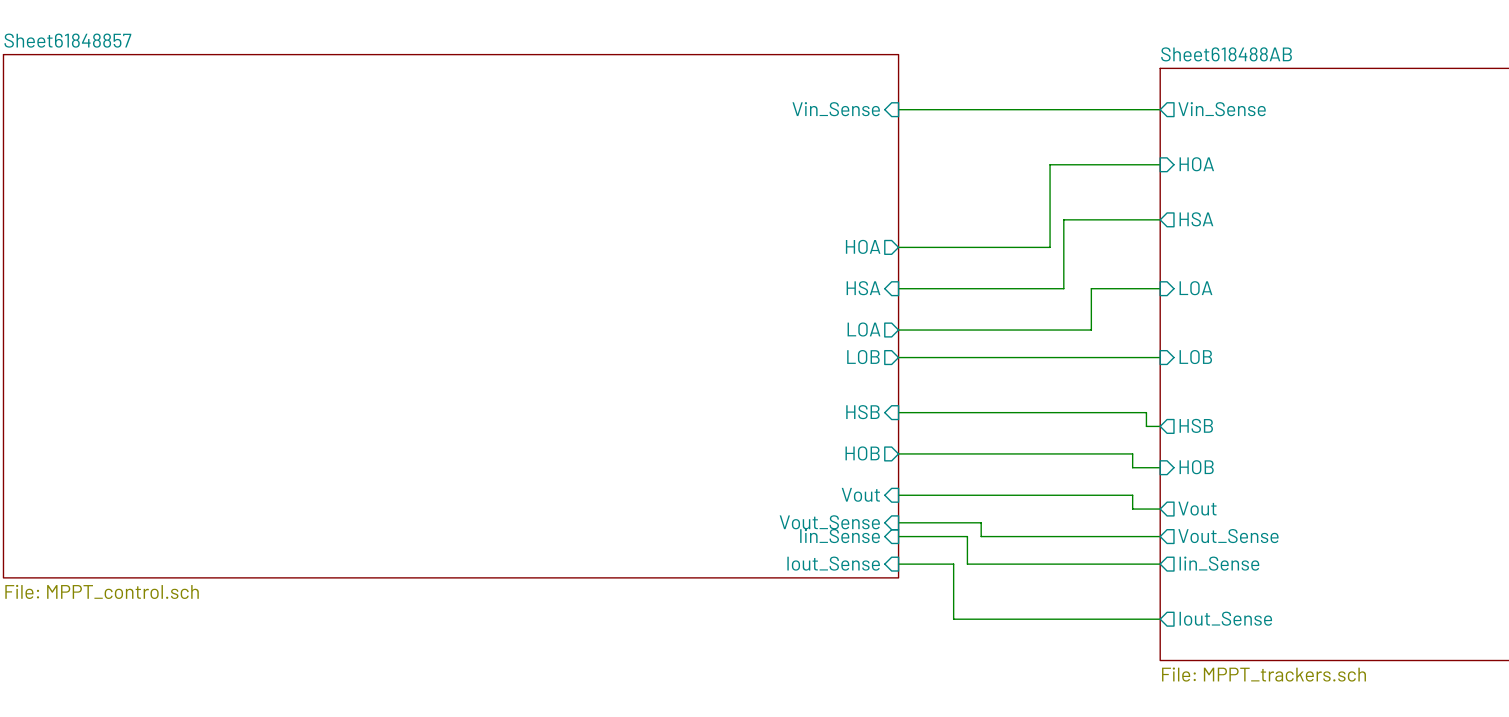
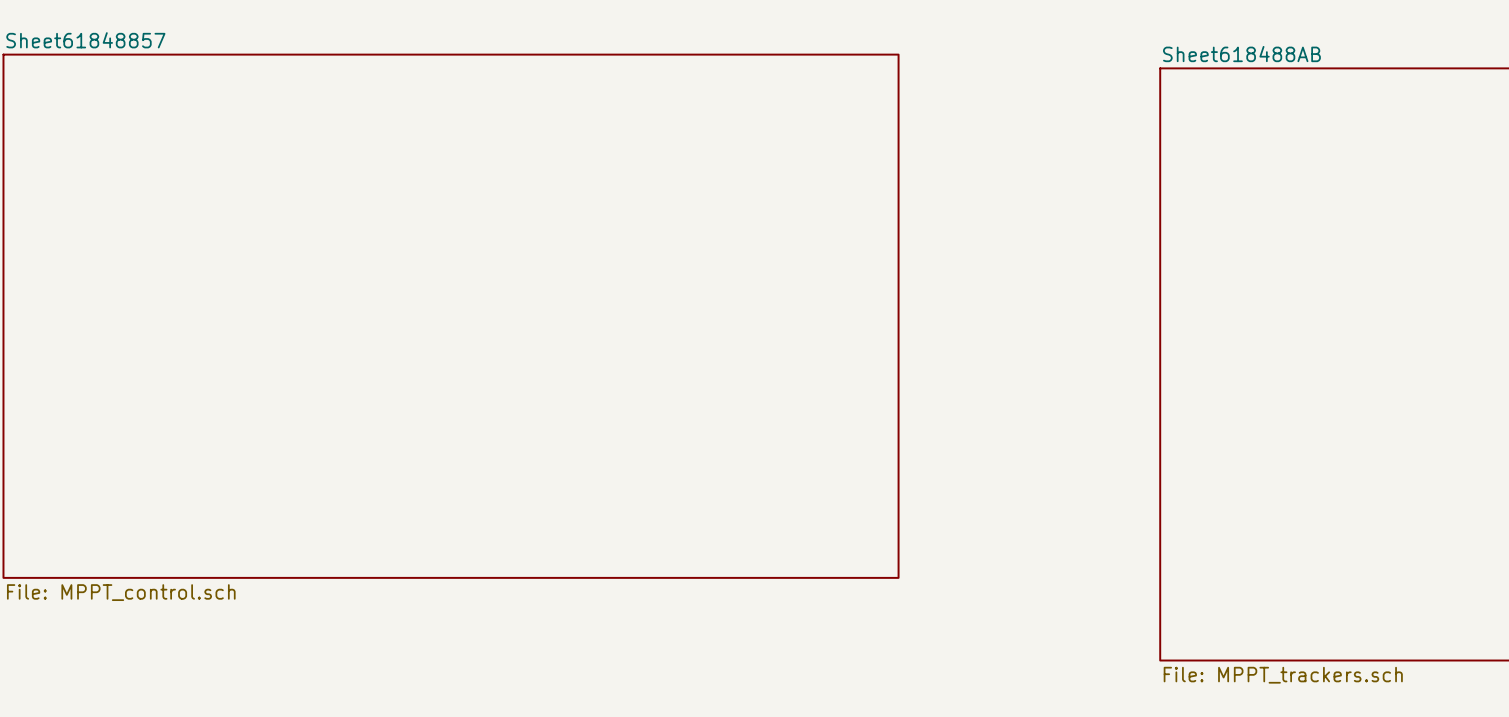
sheet pin: Vin_Sense (836, 109) -> none
wire: (898, 109) (1160, 109) -> none
sheet pin: Vin_Sense (1222, 109) -> none
wire: (1160, 164) (1050, 164) (1050, 247) (898, 247) -> none
sheet pin: HOA (1196, 164) -> none
wire: (1160, 219) (1063, 219) (1063, 288) (898, 288) -> none
sheet pin: HSA (1196, 219) -> none
sheet pin: HOA (863, 246) -> none
sheet pin: HSA (863, 288) -> none
wire: (1160, 288) (1091, 288) (1091, 330) (898, 330) -> none
sheet pin: LOA (1195, 288) -> none
sheet pin: LOA (863, 329) -> none
sheet pin: LOB (863, 357) -> none
wire: (898, 357) (1160, 357) -> none
sheet pin: LOB (1195, 357) -> none
sheet pin: HSB (862, 412) -> none
wire: (898, 412) (1146, 412) (1146, 426) (1160, 426) -> none
sheet pin: HSB (1196, 425) -> none
sheet pin: HOB (862, 453) -> none
wire: (898, 453) (1132, 453) (1132, 467) (1160, 467) -> none
sheet pin: HOB (1196, 467) -> none
sheet pin: Vout (860, 494) -> none
wire: (898, 495) (1132, 495) (1132, 509) (1160, 509) -> none
sheet pin: Vout (1197, 508) -> none
sheet pin: Vout_Sense (829, 522) -> none
wire: (898, 522) (981, 522) (981, 536) (1160, 536) -> none
sheet pin: Iin_Sense (840, 536) -> none
wire: (898, 536) (967, 536) (967, 564) (1160, 564) -> none
sheet pin: Vout_Sense (1228, 536) -> none
sheet pin: Iout_Sense (833, 563) -> none
sheet pin: Iin_Sense (1219, 563) -> none
wire: (898, 564) (953, 564) (953, 619) (1160, 619) -> none
sheet pin: Iout_Sense (1225, 618) -> none

